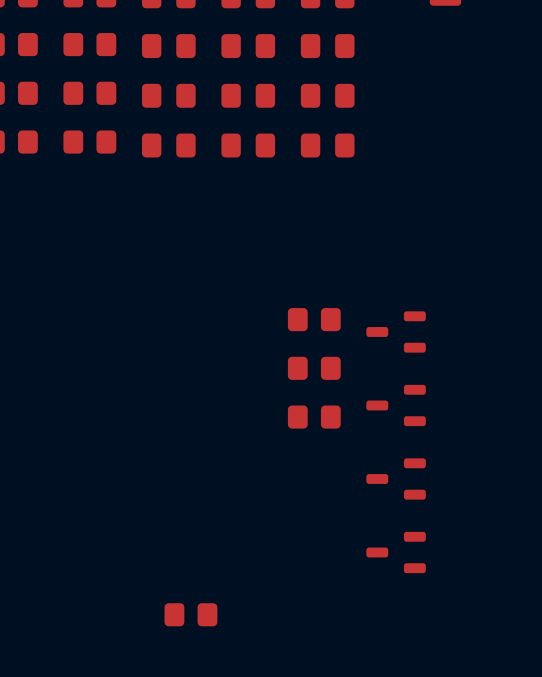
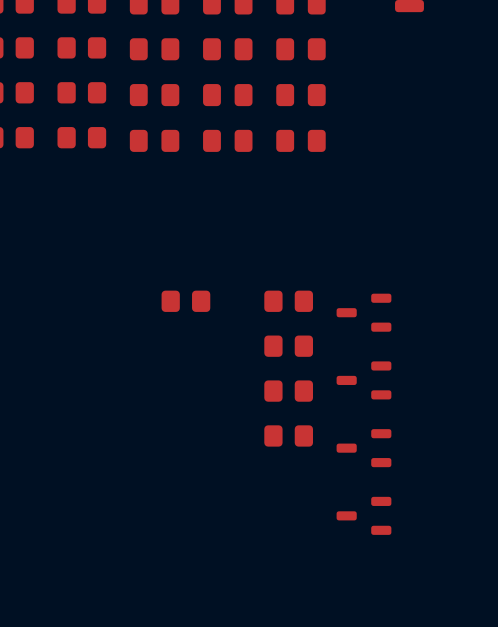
part: none -> (185, 301)
part: none -> (288, 435)
part: (190, 614) -> none

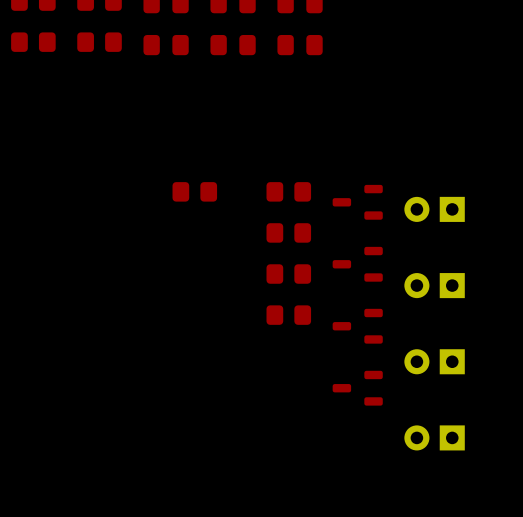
part: none -> (434, 209)
part: none -> (434, 285)
part: none -> (434, 361)
part: none -> (434, 437)

